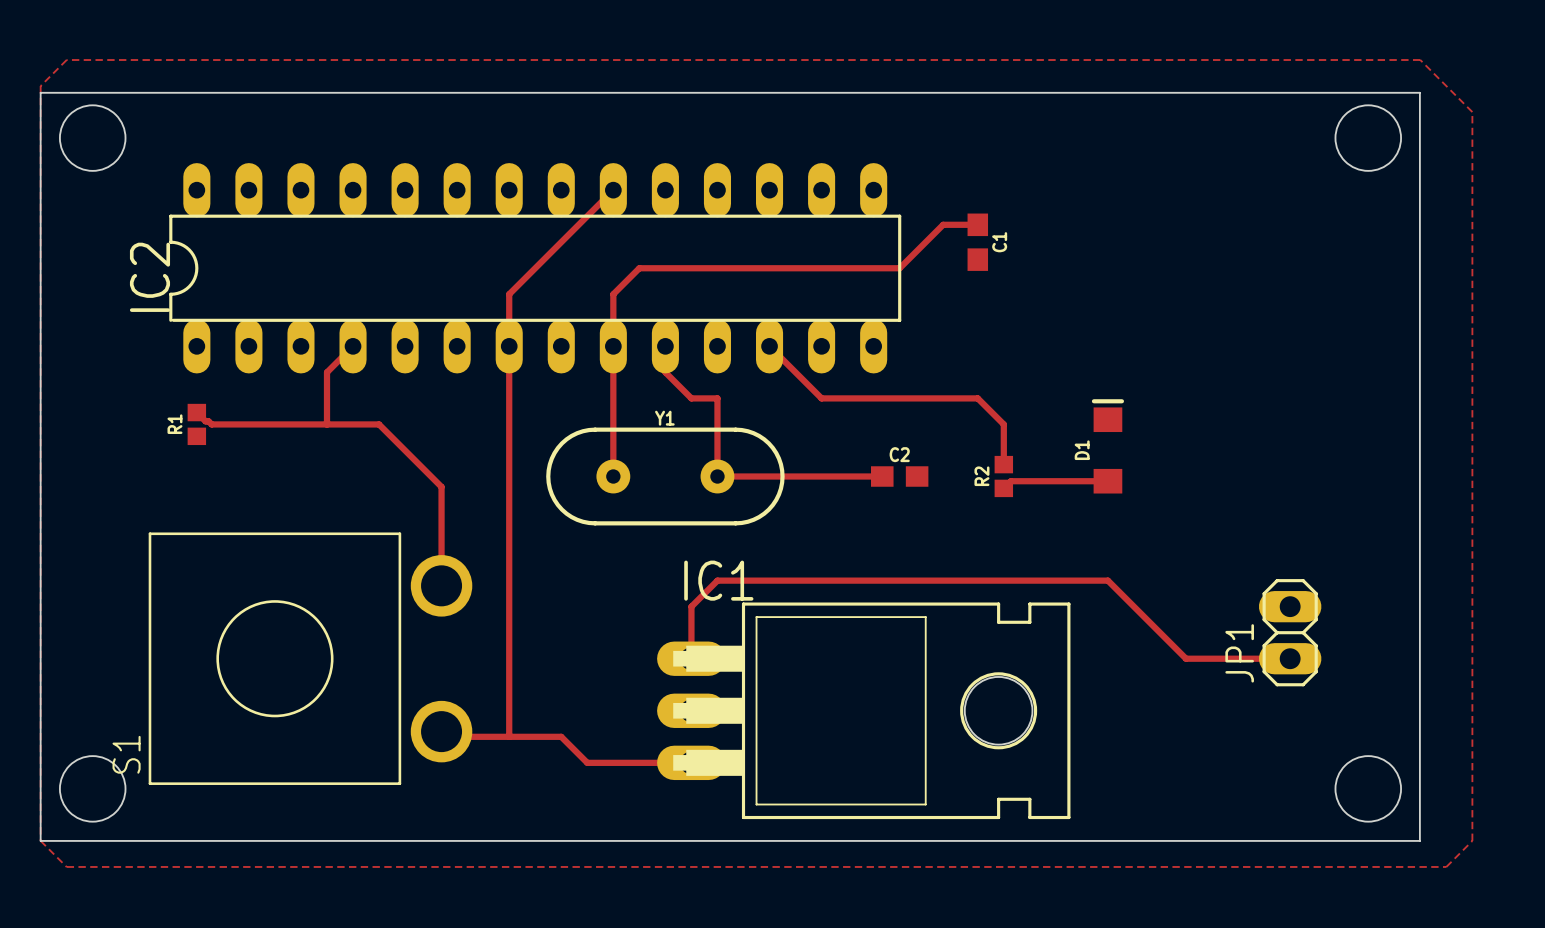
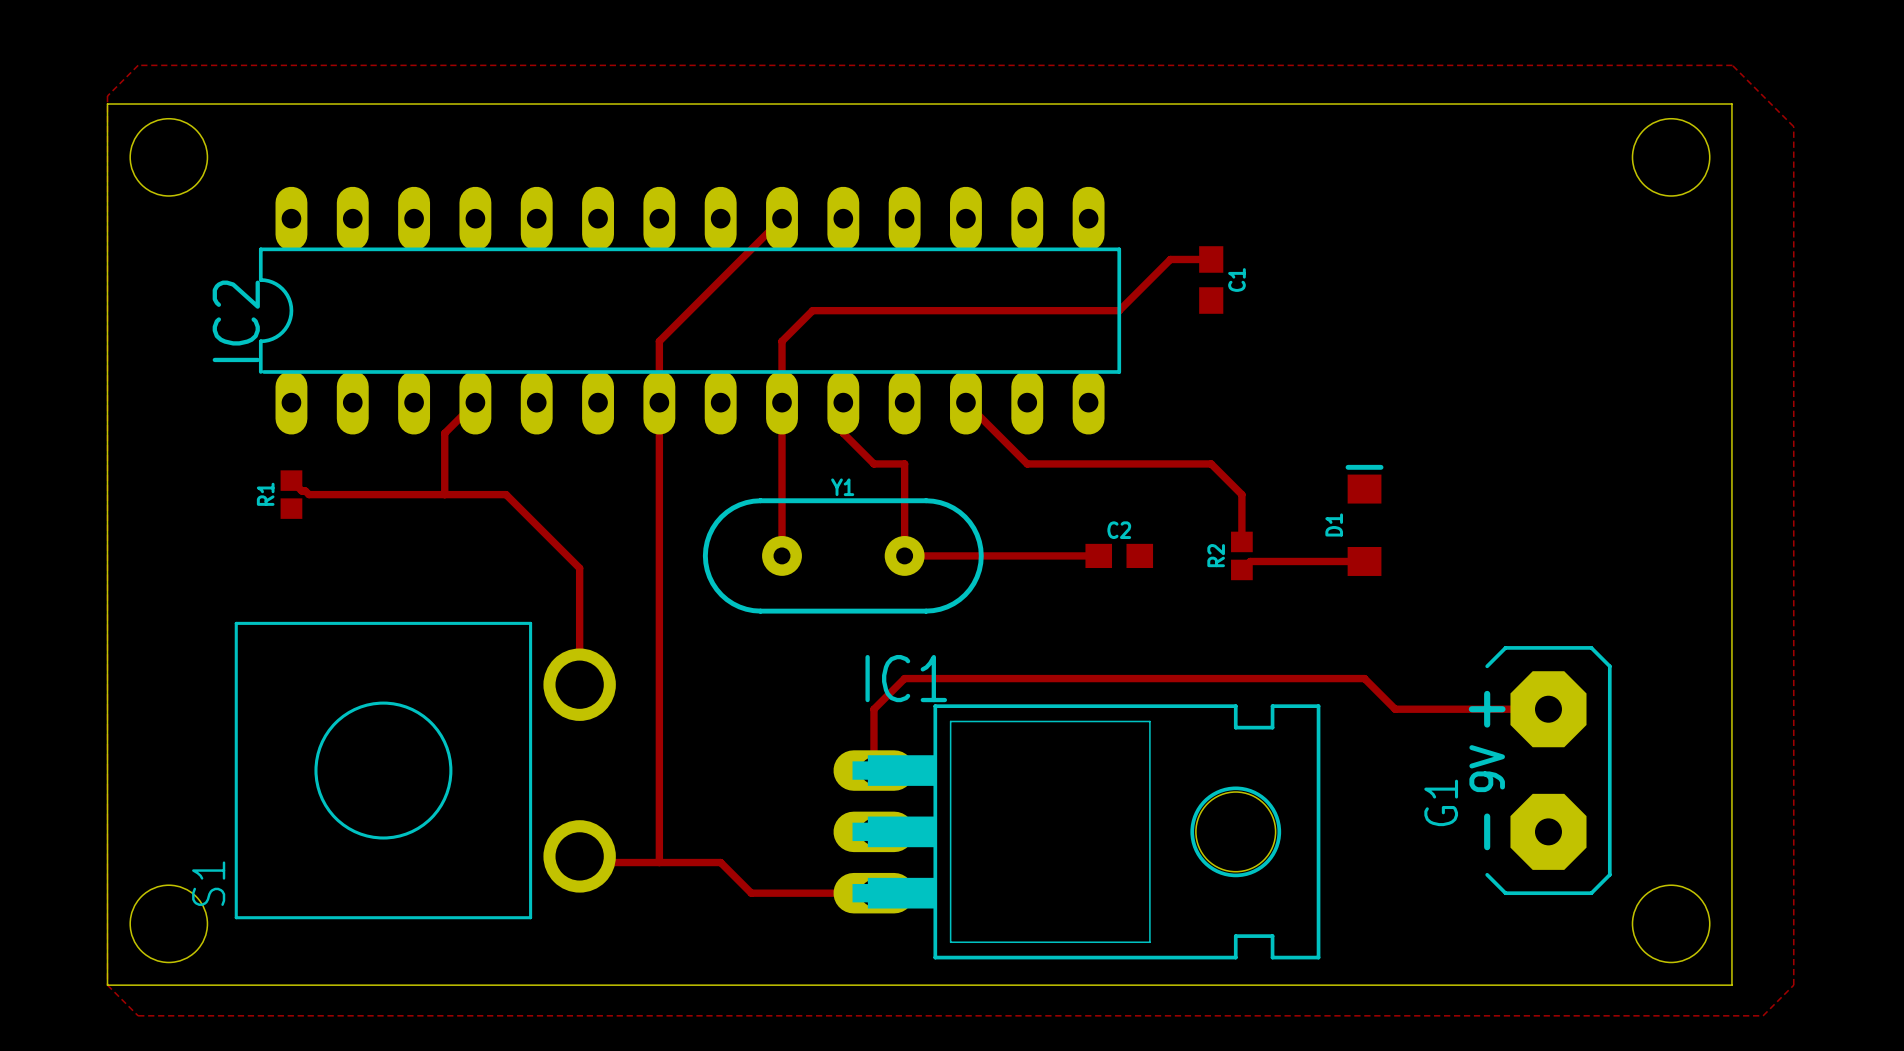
track: (1133, 606) (1186, 658) (1290, 658) -> (1395, 709) (1548, 709)
JP1: (1290, 632) -> none
G1: none -> (1540, 770)

